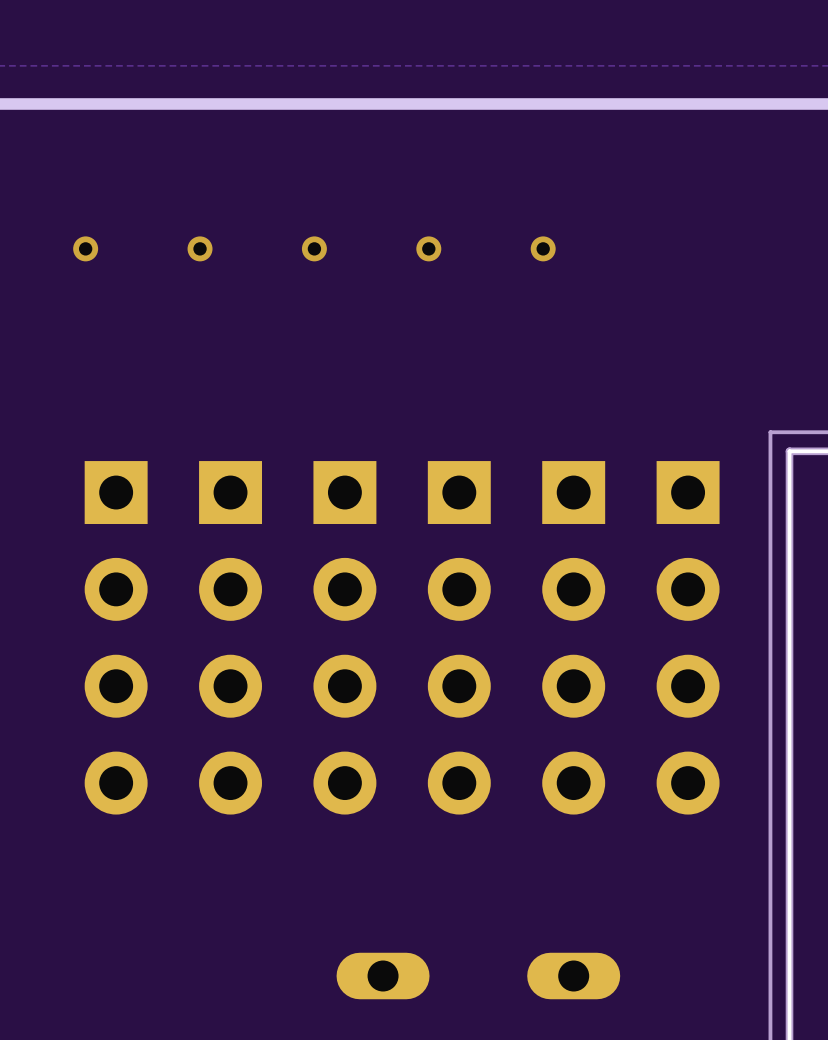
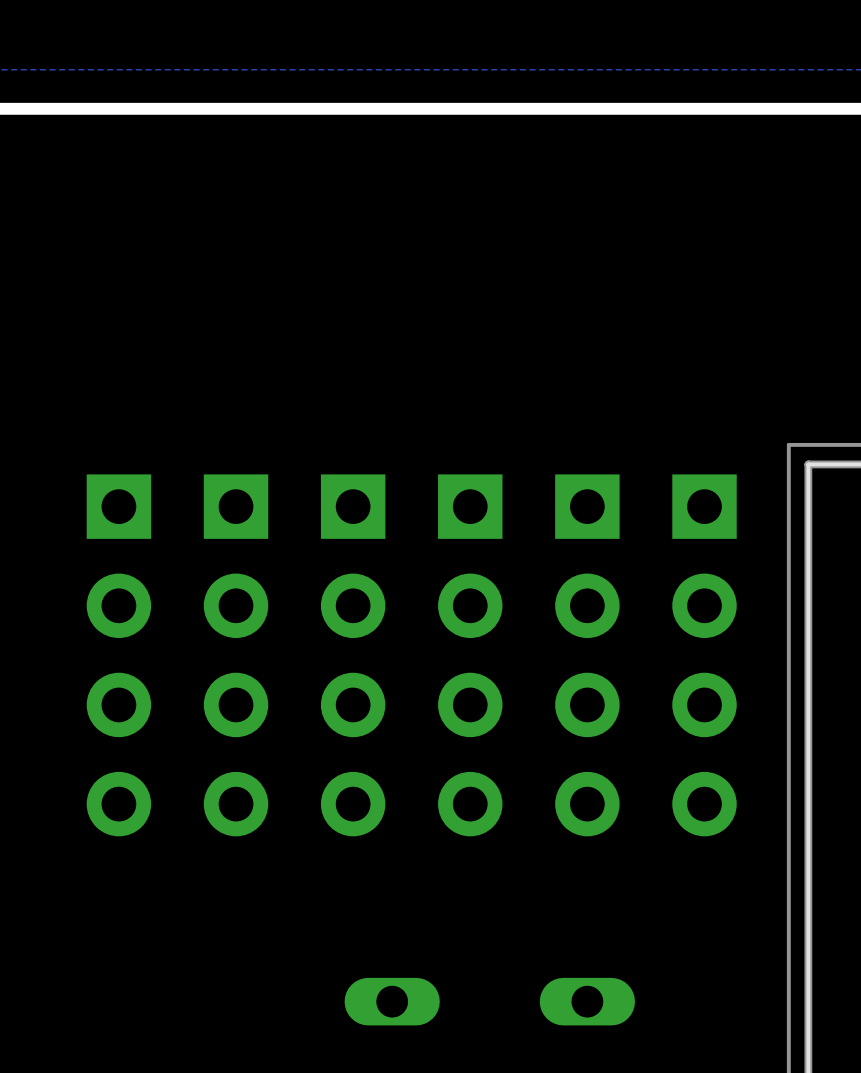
via: (85, 248) -> none
via: (200, 248) -> none
via: (314, 248) -> none
via: (428, 248) -> none
via: (543, 248) -> none

